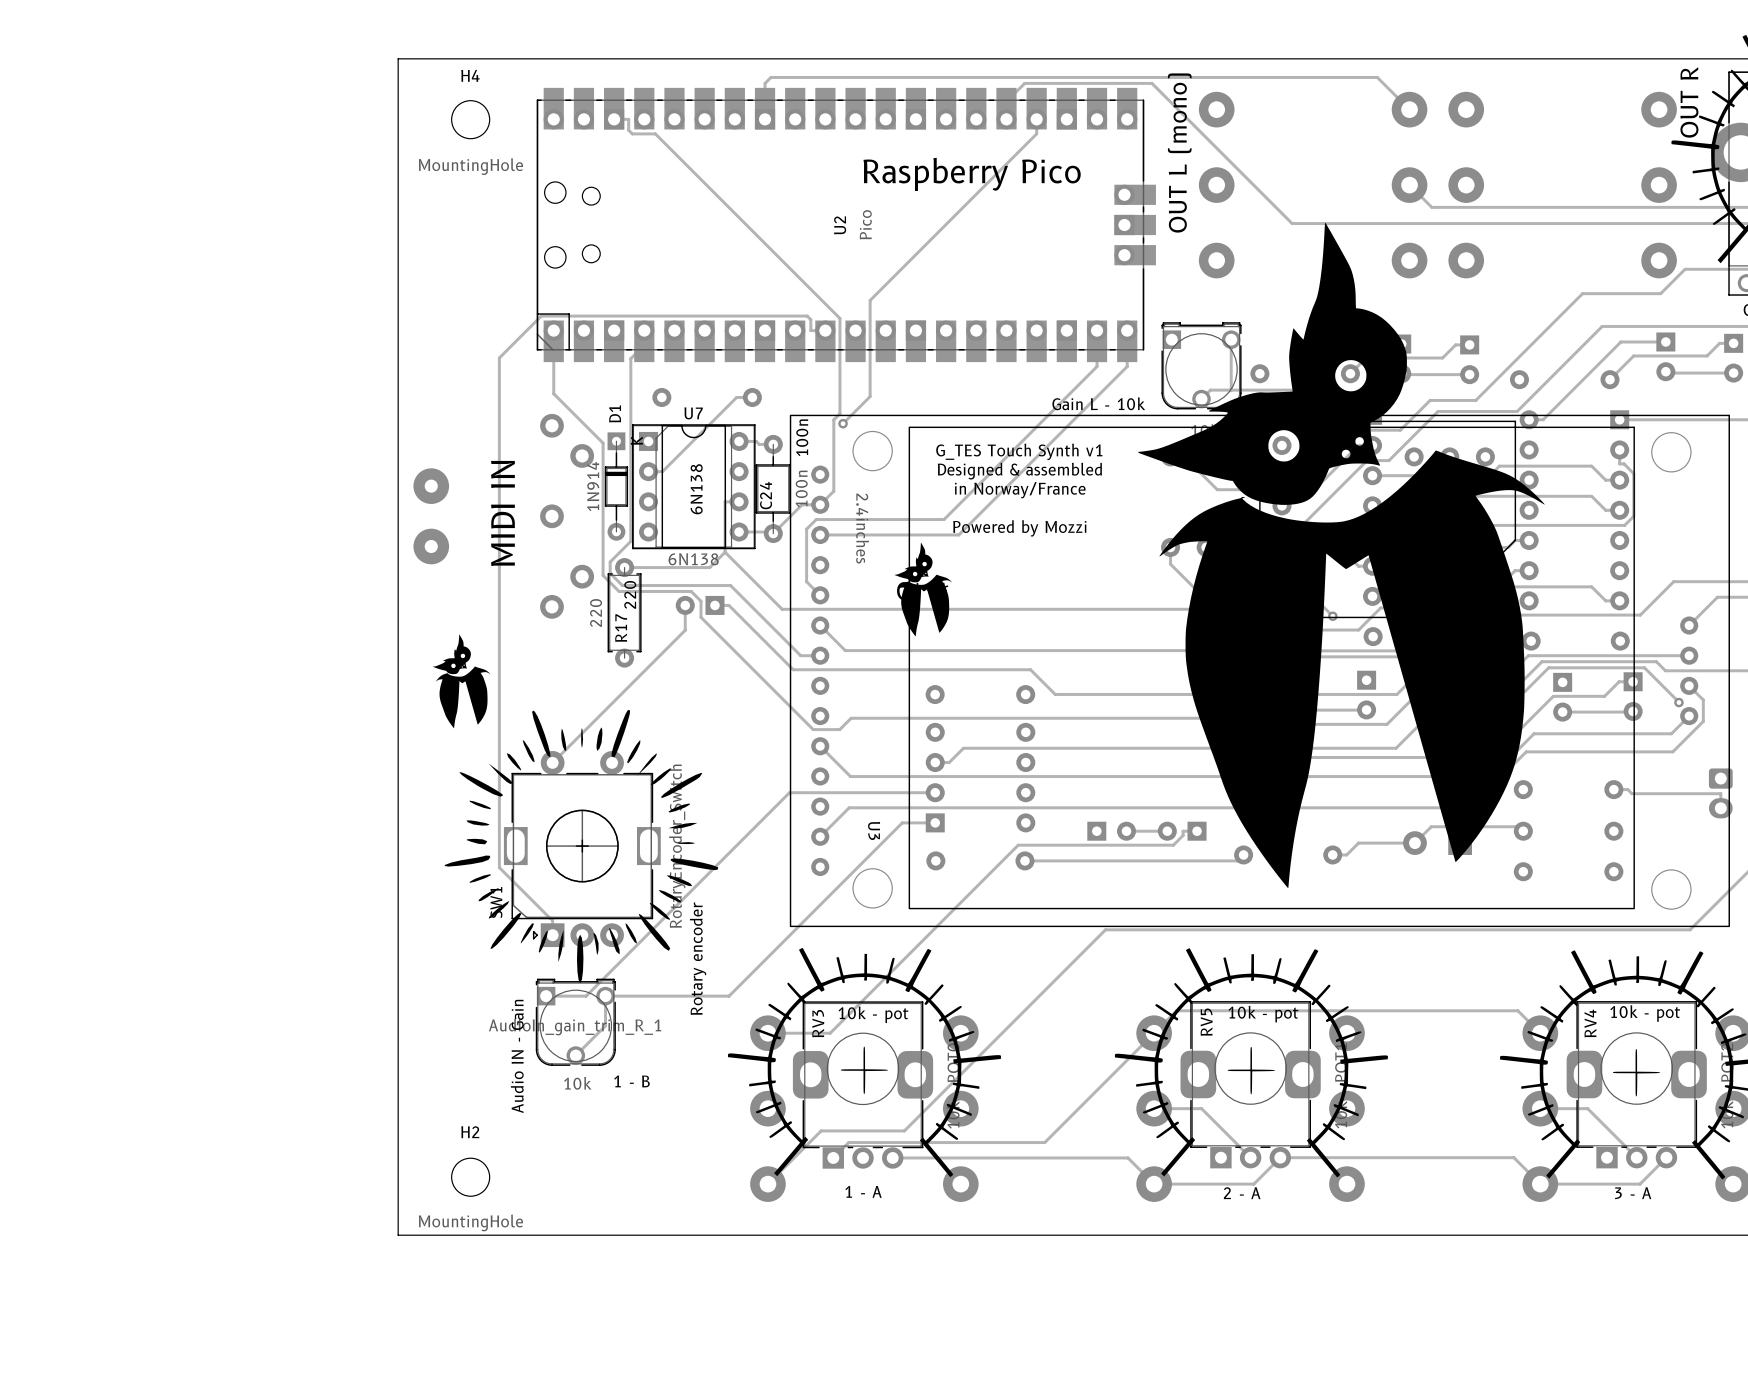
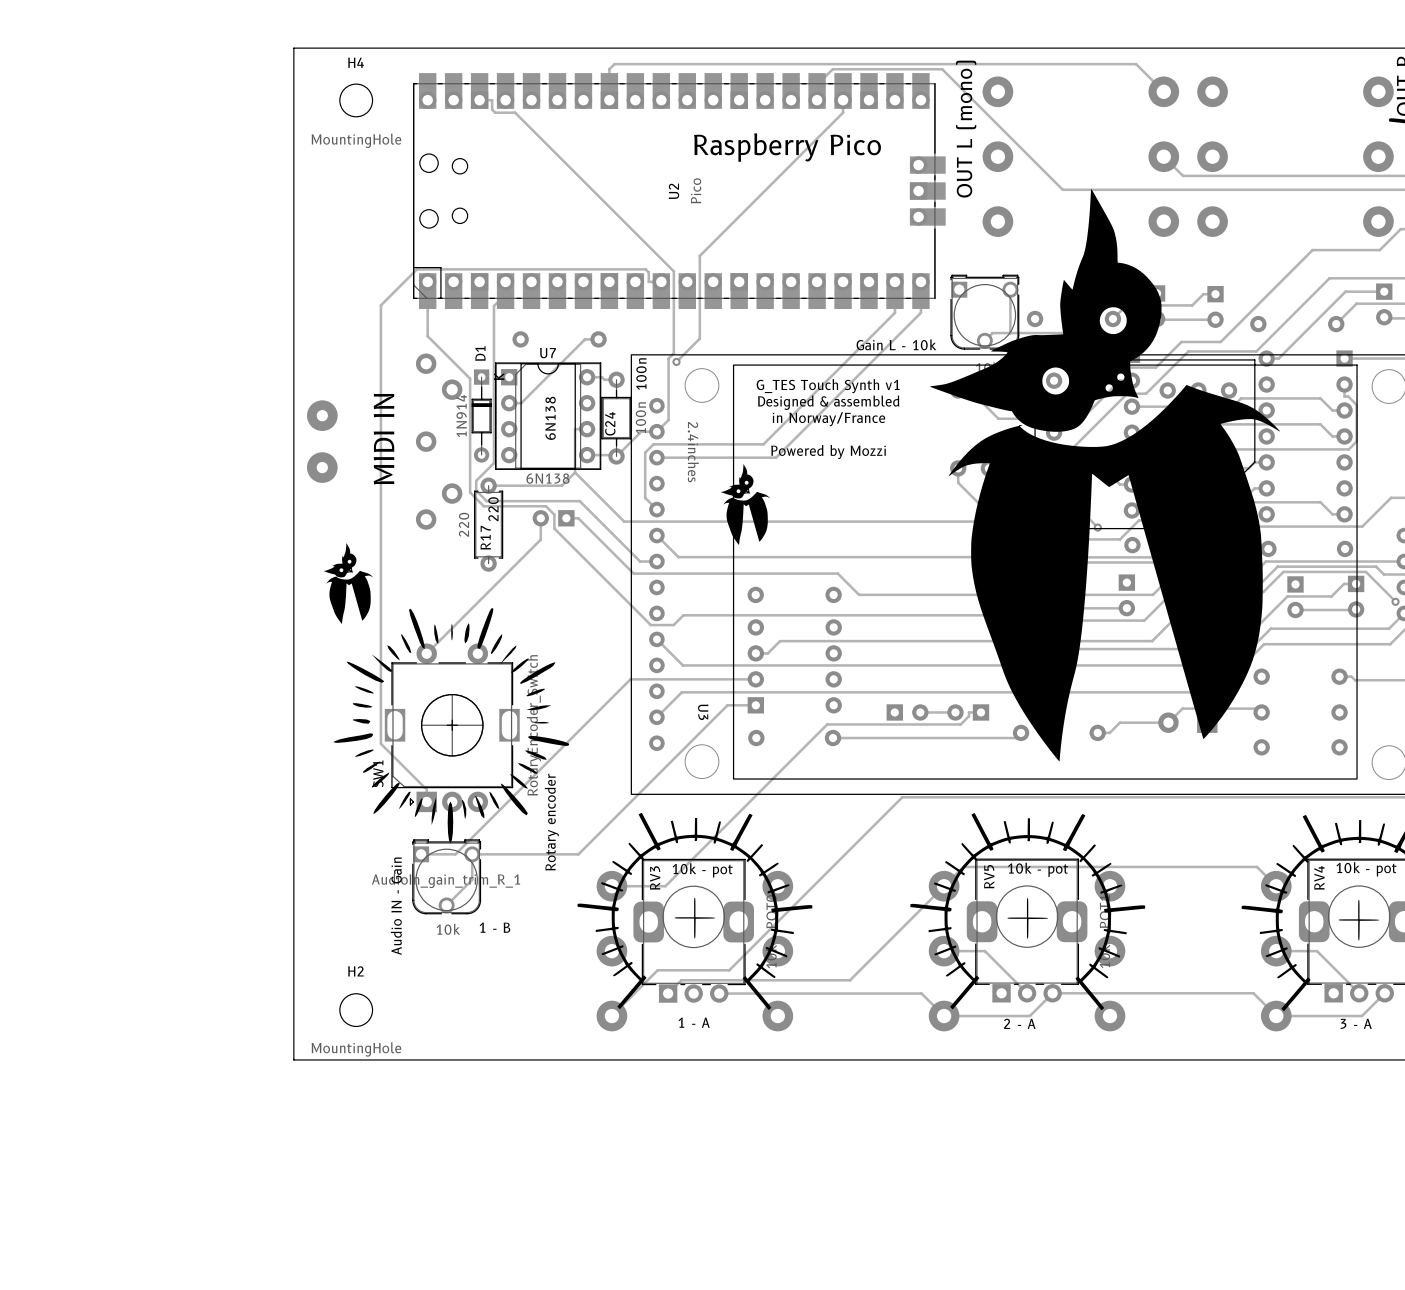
drawing: none -> [720, 464, 771, 546]
part: (923, 589) -> none

